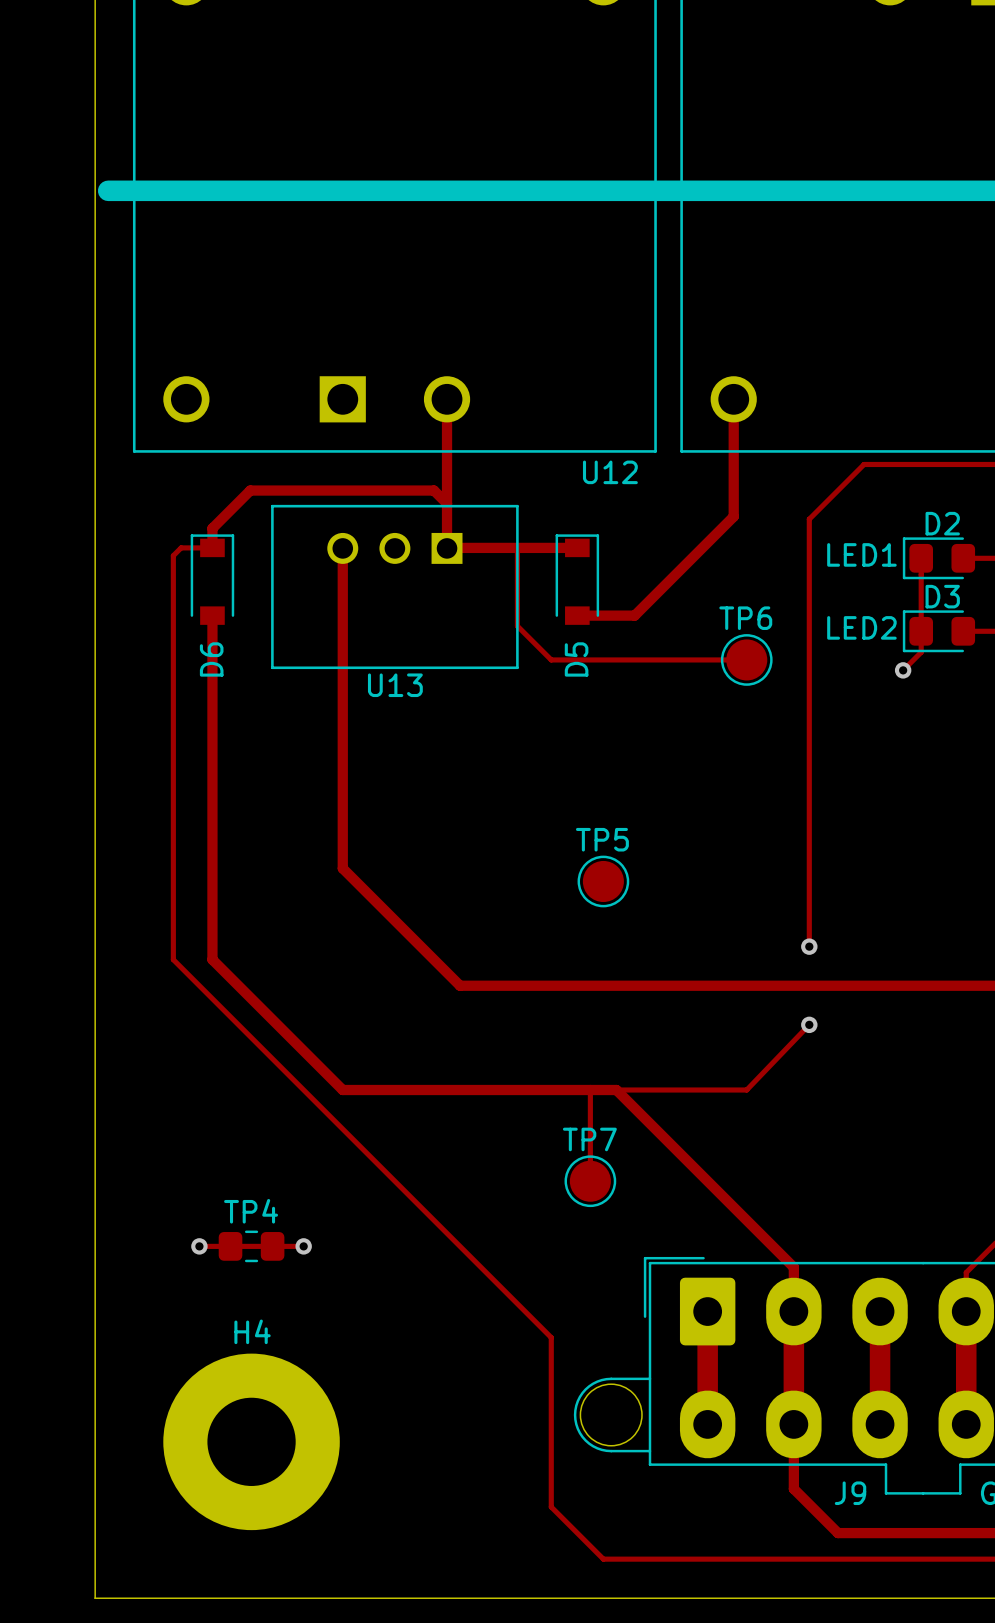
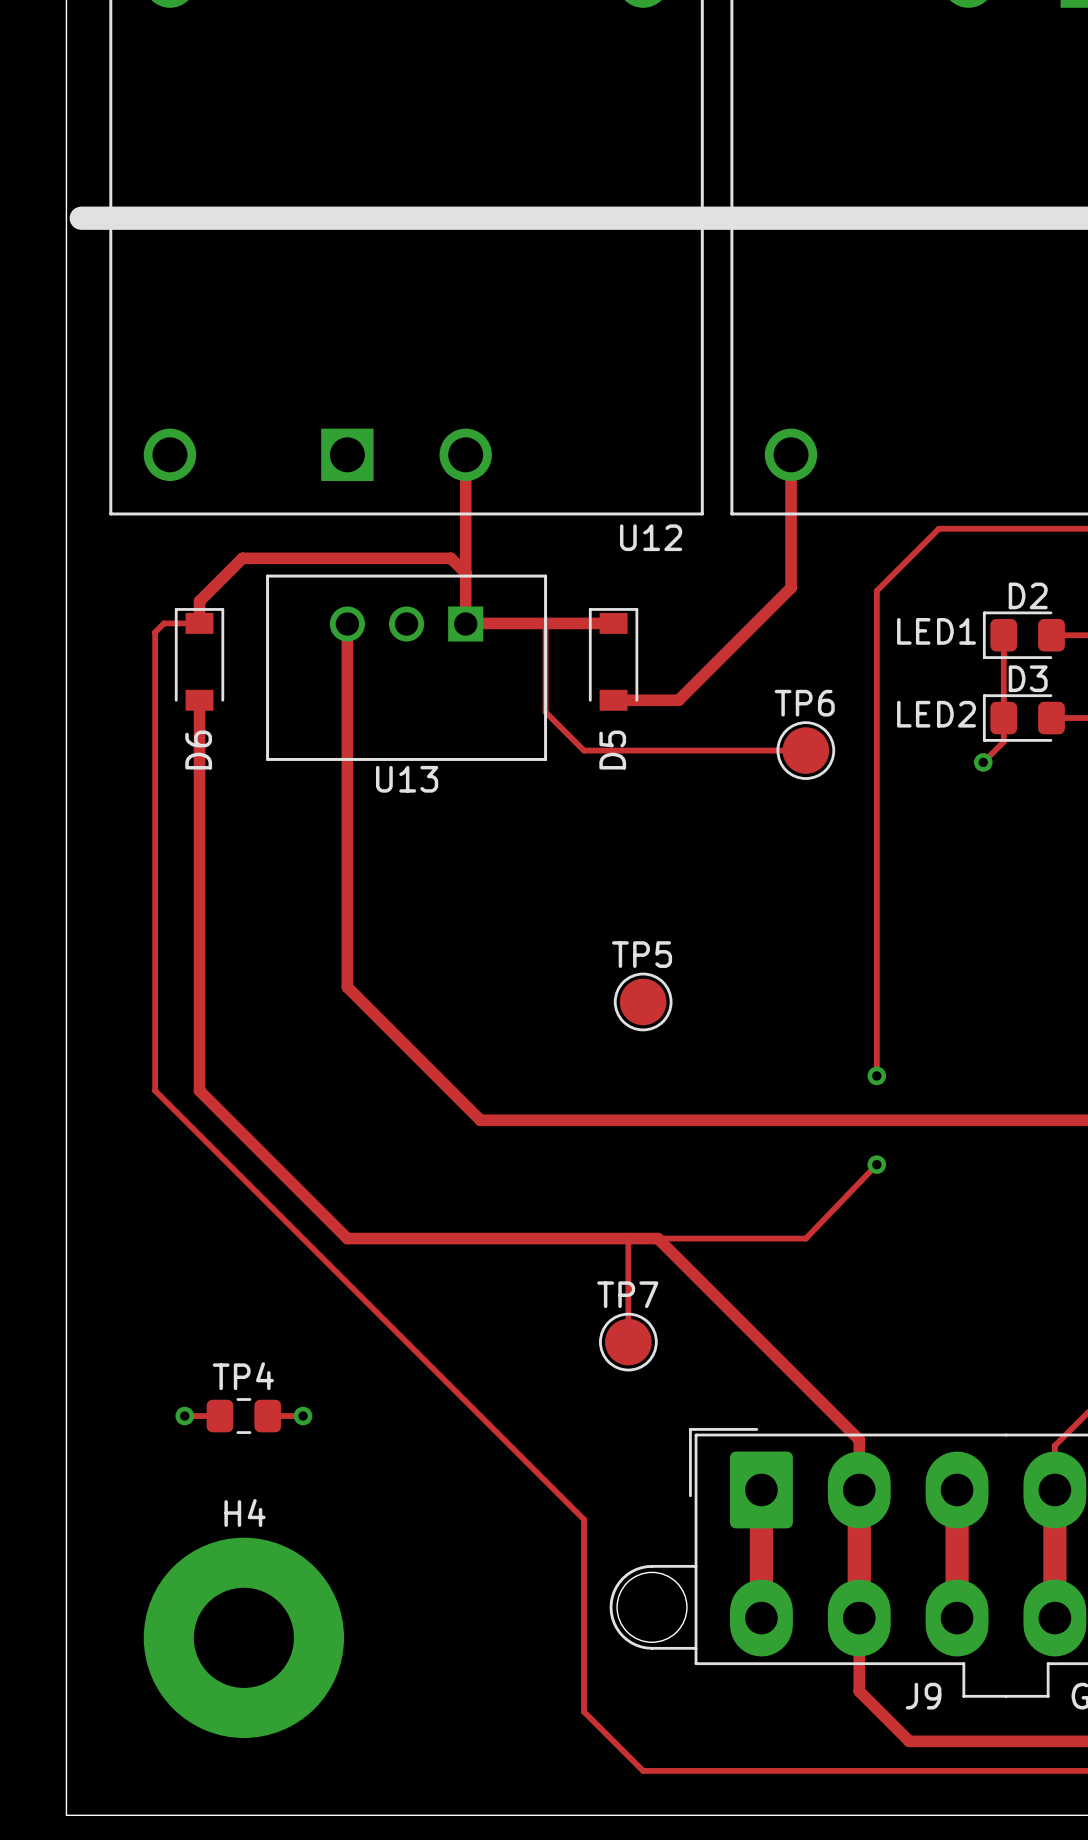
track: (230, 1246) (272, 1246) -> none

